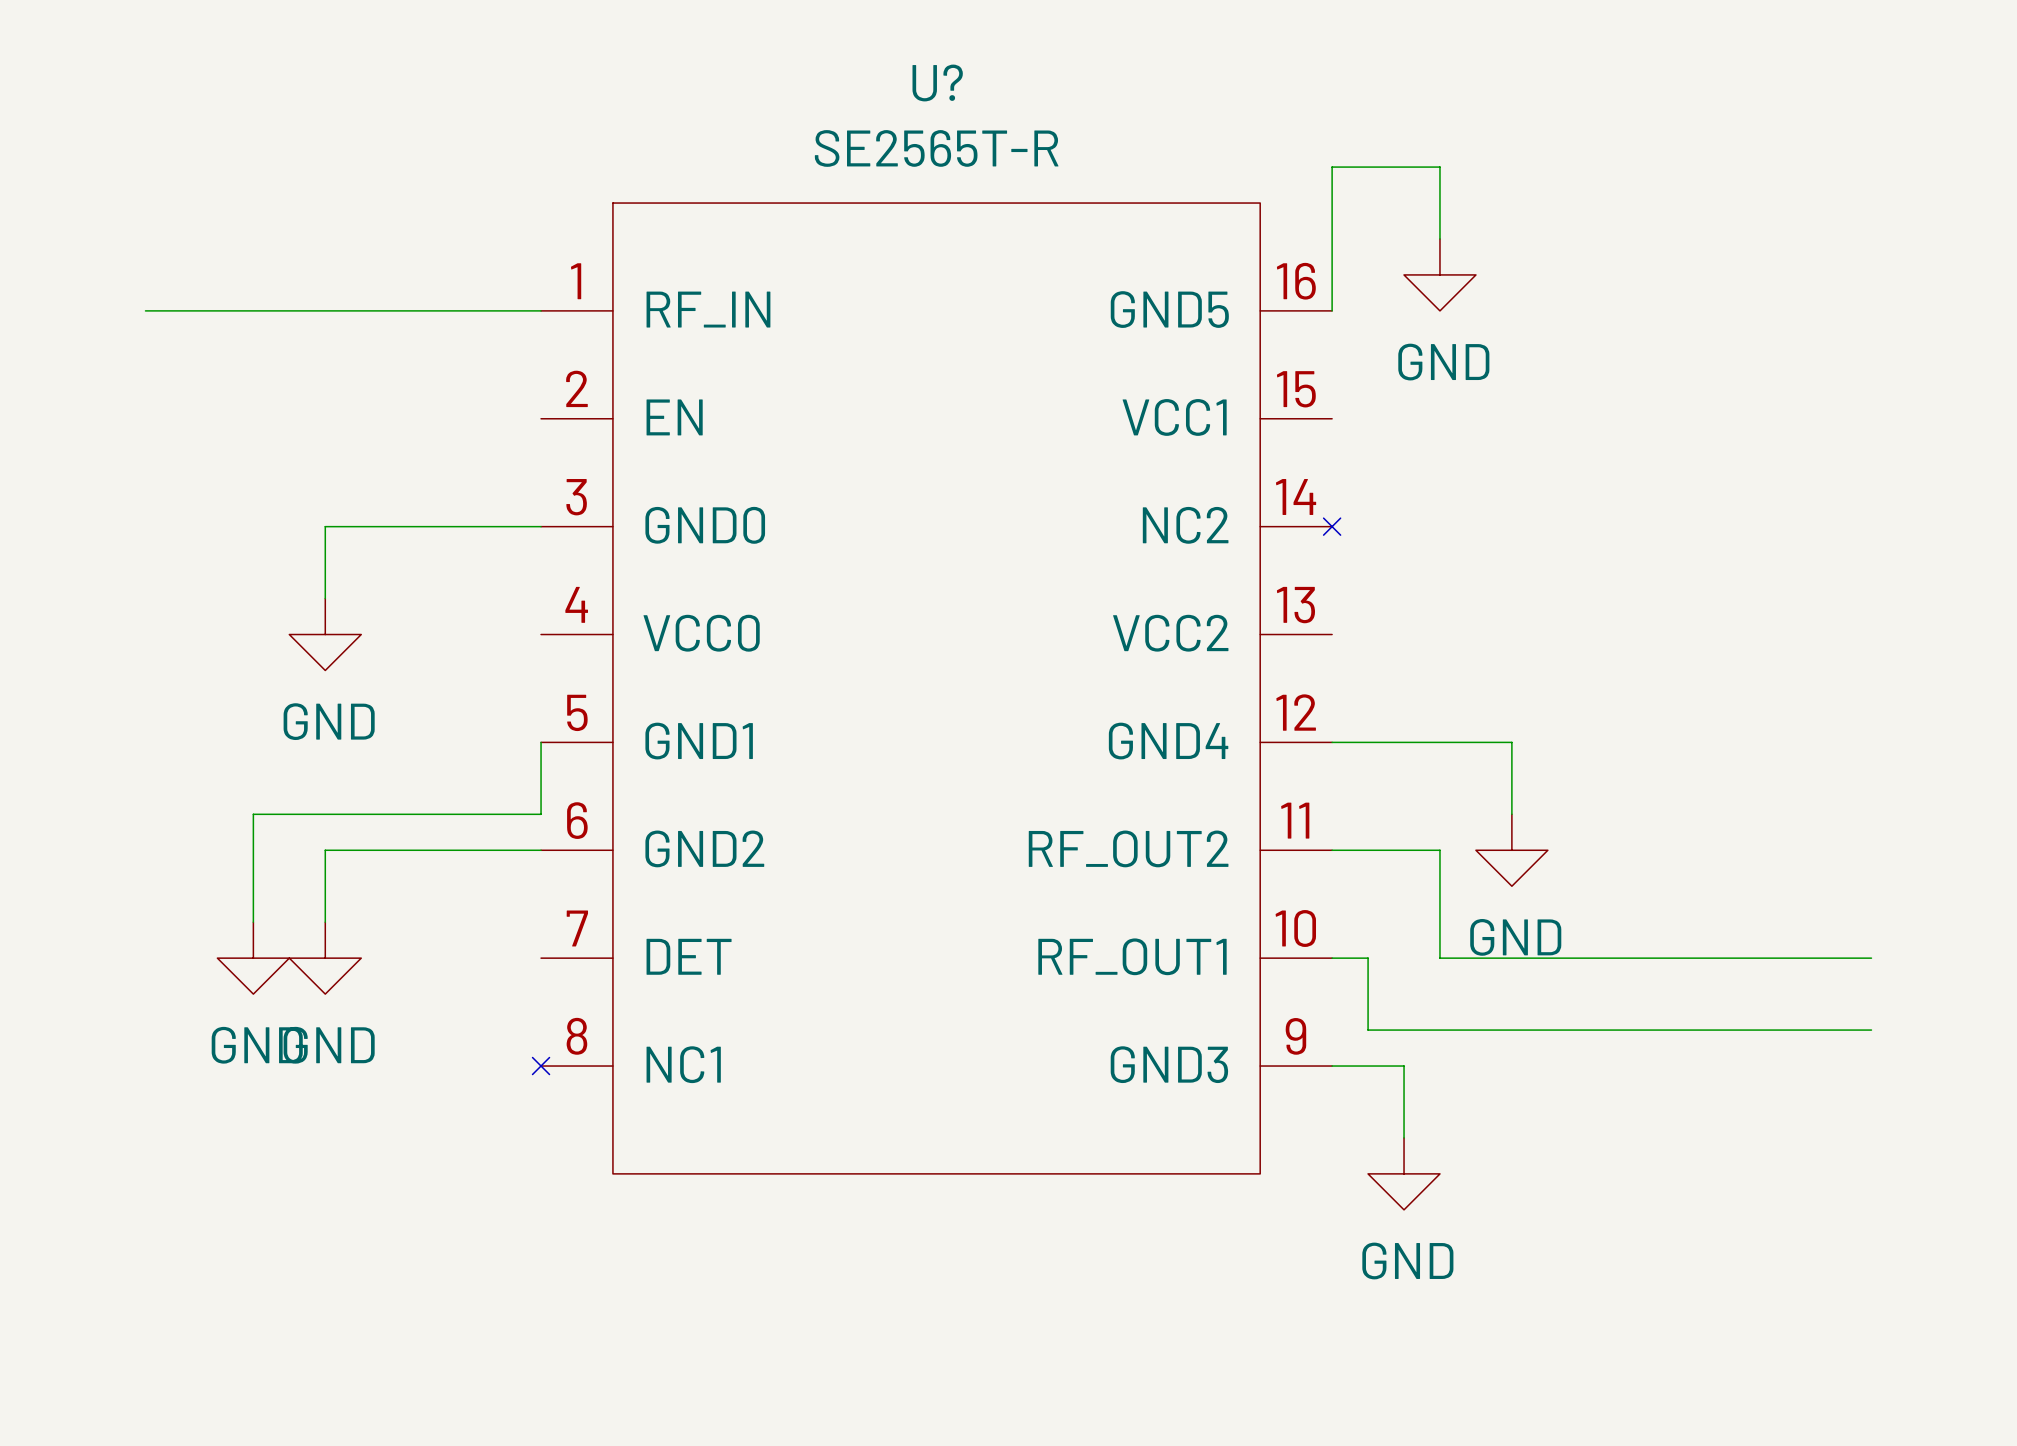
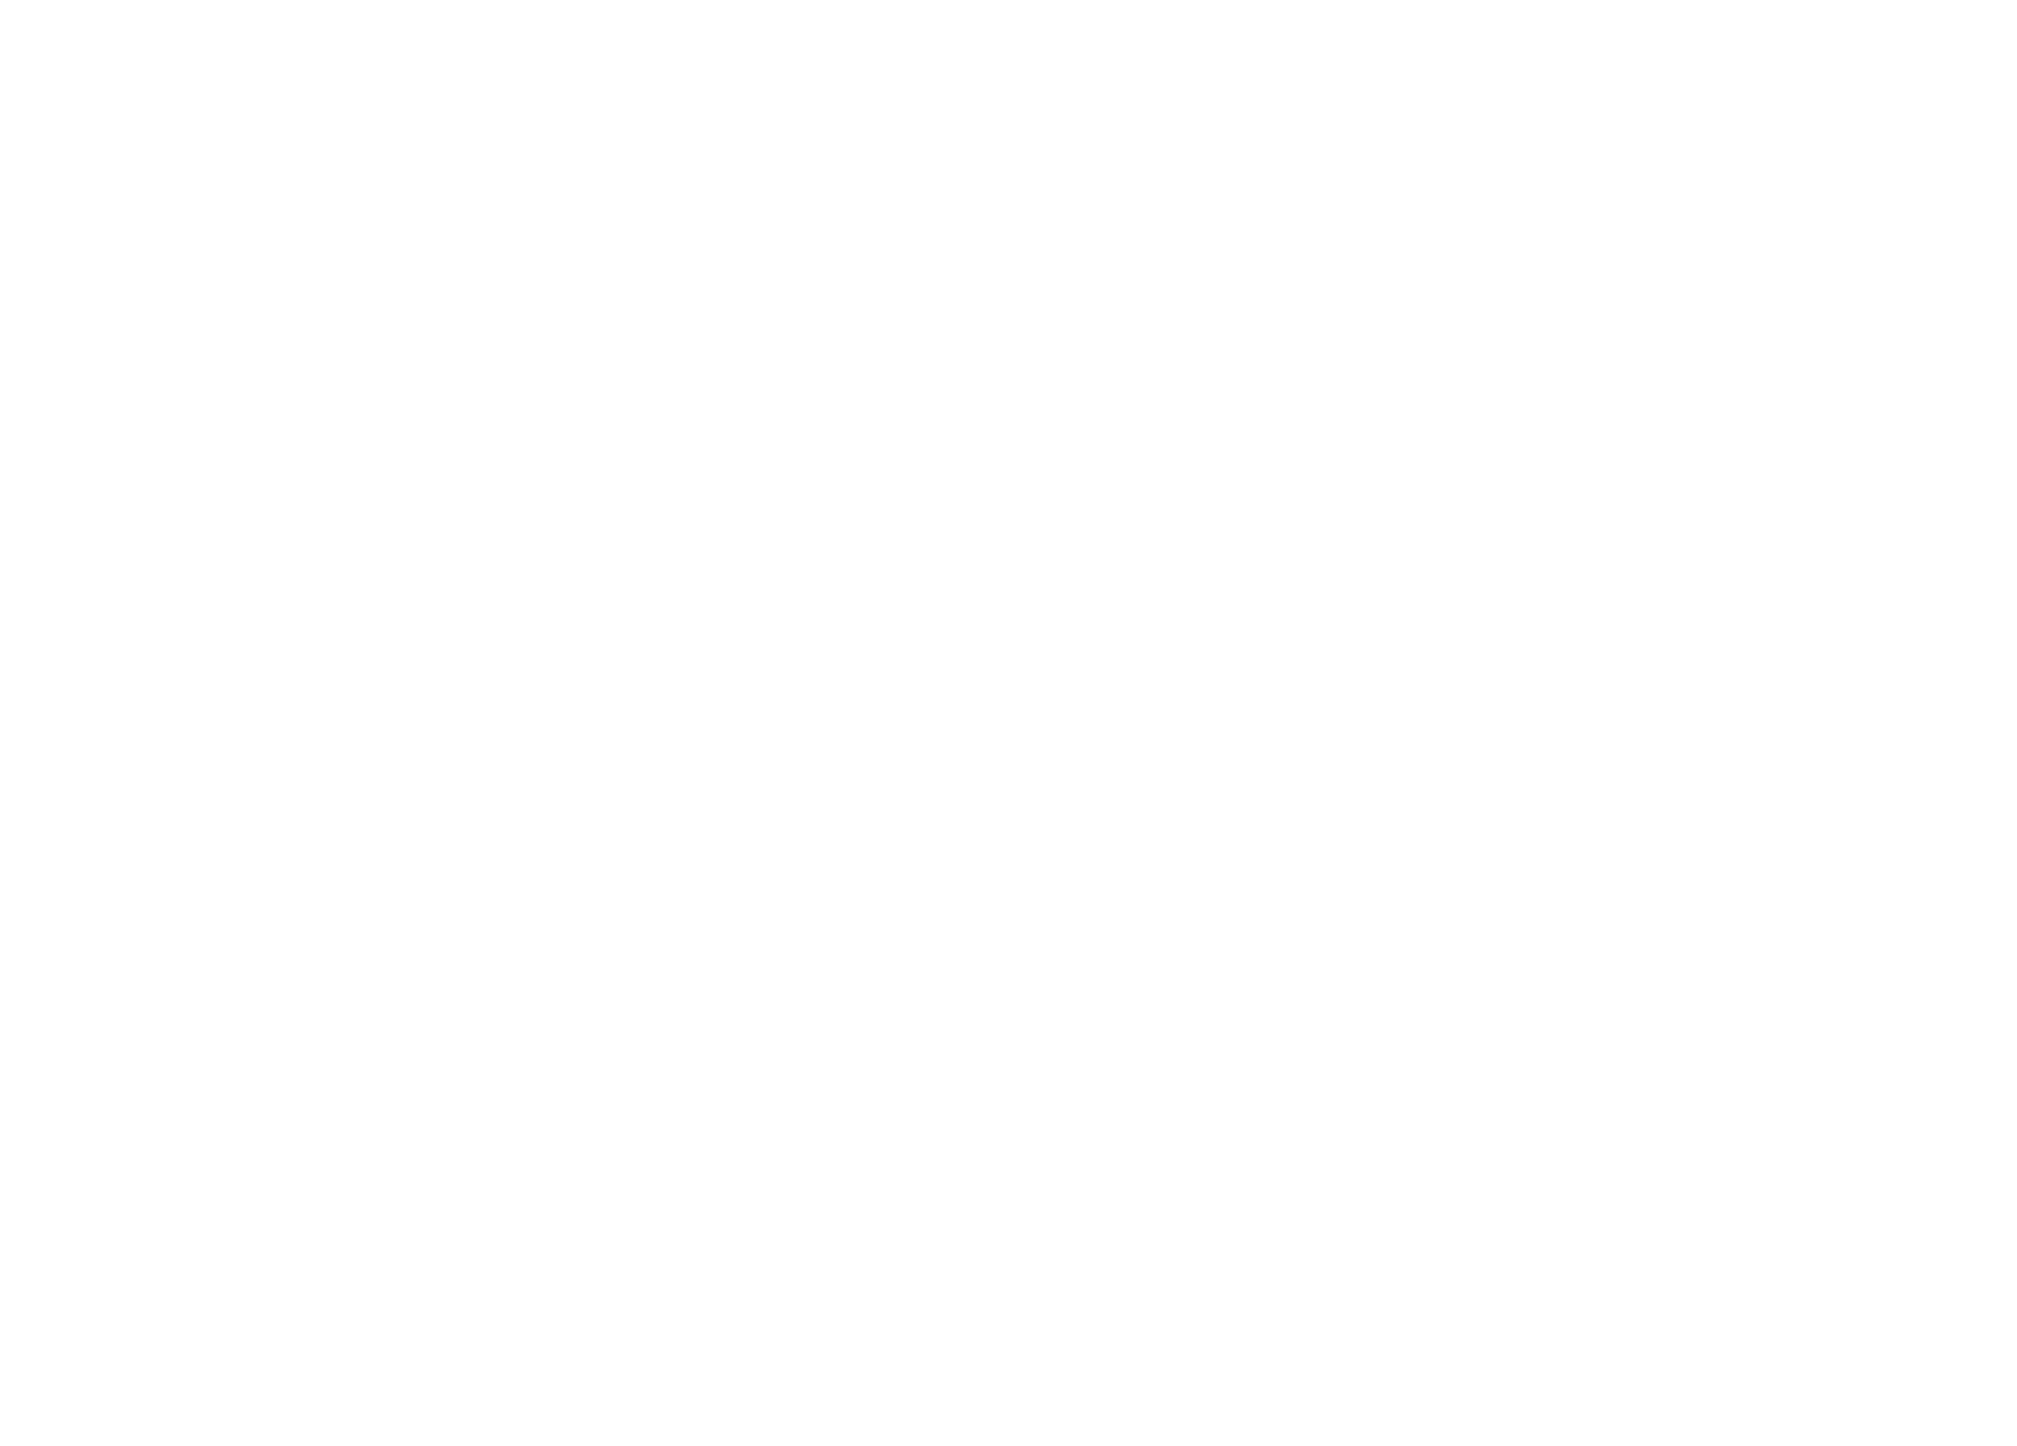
wire: (1439, 238) (1439, 167) (1332, 167) (1332, 310) -> none
power symbol: GND (1439, 274) -> none
wire: (145, 310) (541, 310) -> none
wire: (541, 526) (325, 526) (325, 598) -> none
power symbol: GND (325, 634) -> none
U?: SE2565T-R (936, 688) -> none
wire: (541, 742) (541, 814) (253, 814) (253, 922) -> none
wire: (1332, 742) (1511, 742) (1511, 814) -> none
wire: (541, 850) (325, 850) (325, 922) -> none
wire: (1332, 850) (1439, 850) (1439, 958) (1871, 958) -> none
power symbol: GND (1511, 850) -> none
power symbol: GND (253, 958) -> none
power symbol: GND (325, 958) -> none
wire: (1332, 958) (1368, 958) (1368, 1030) (1871, 1030) -> none
wire: (1332, 1066) (1404, 1066) (1404, 1137) -> none
power symbol: GND (1404, 1173) -> none

